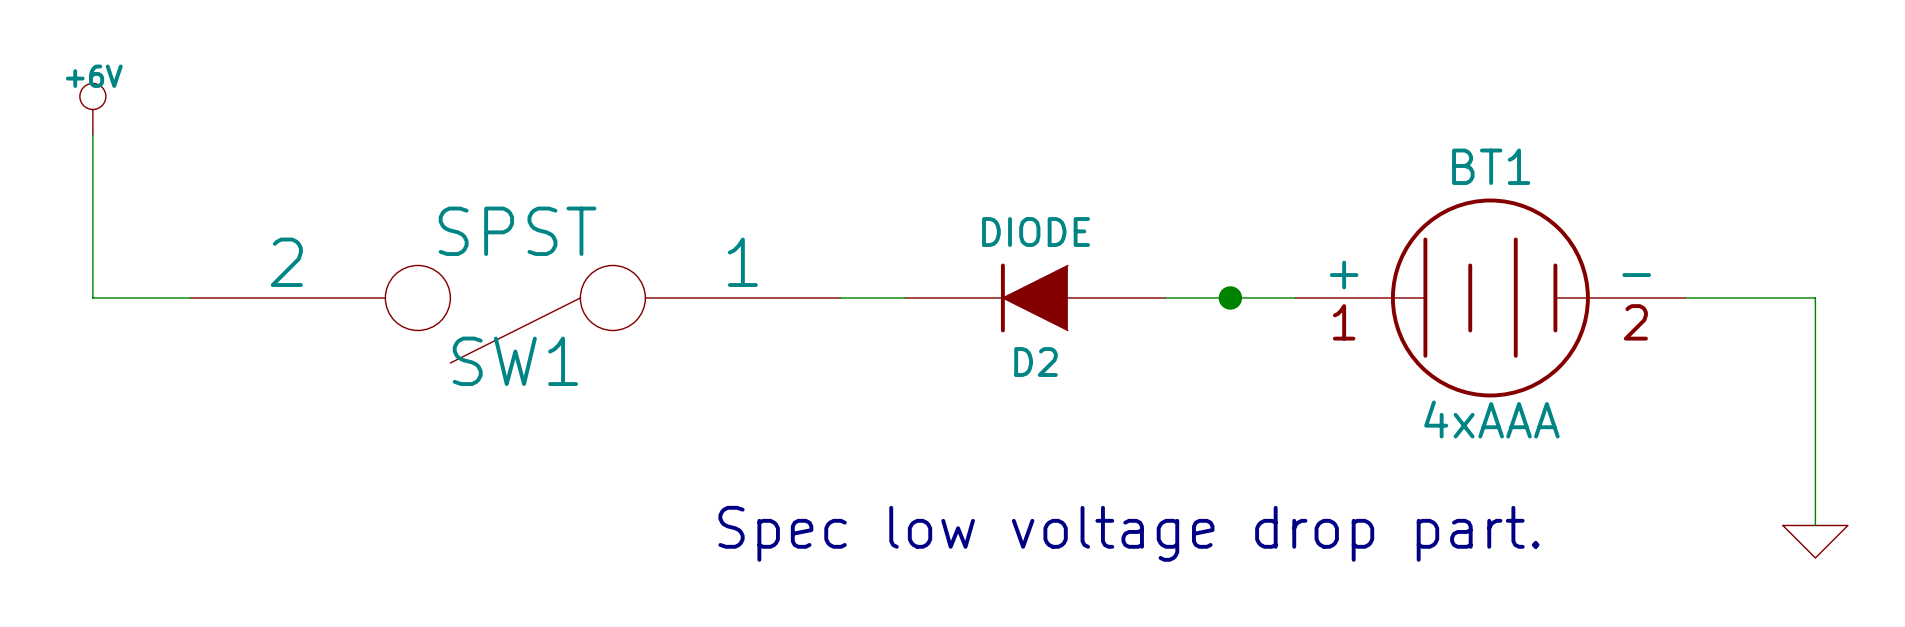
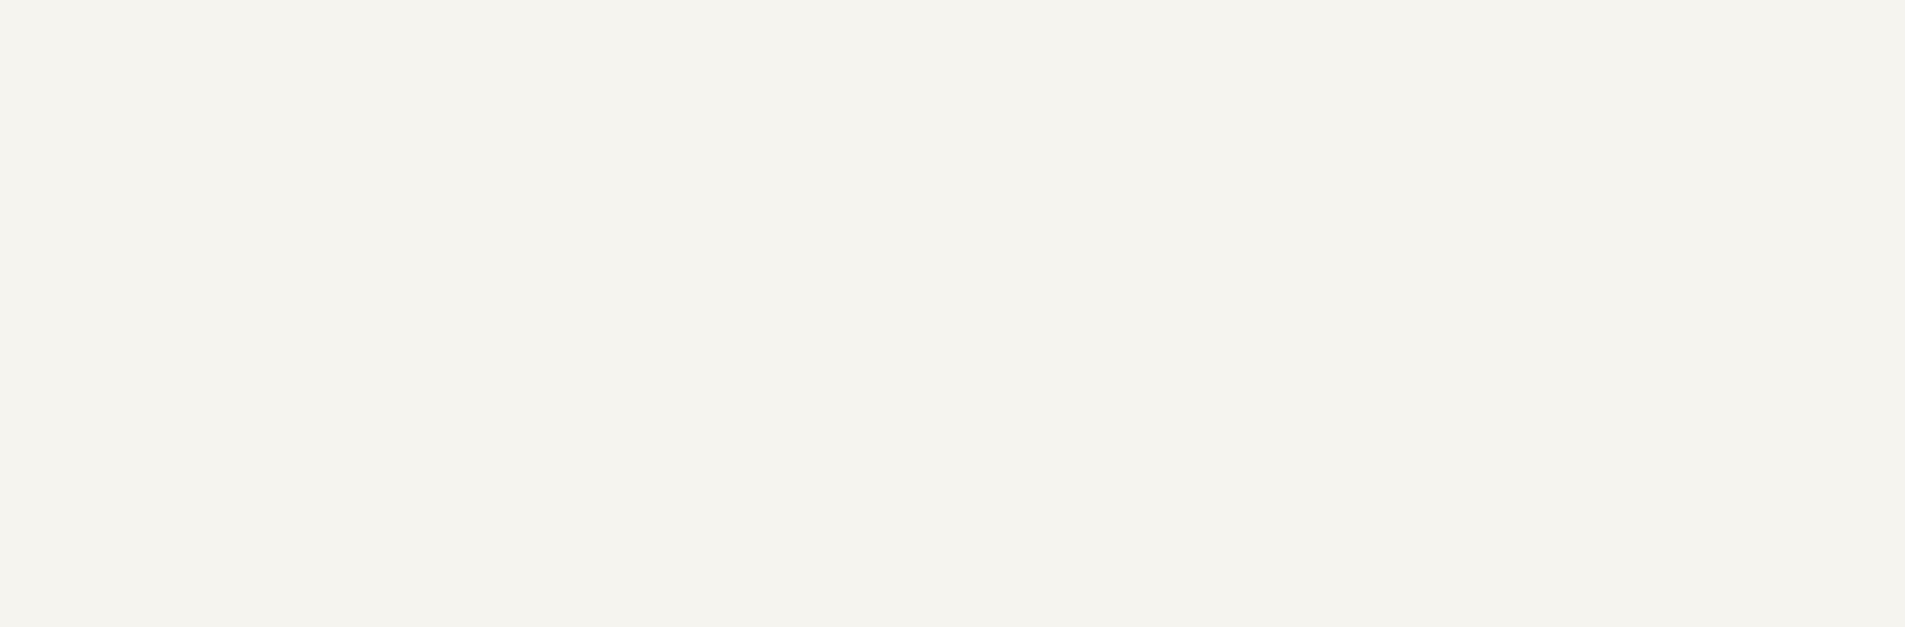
power symbol: +6V (92, 109) -> none
wire: (92, 135) (92, 297) (190, 297) -> none
wire: (840, 297) (905, 297) -> none
D2: DIODE (1035, 297) -> none
wire: (1165, 297) (1295, 297) -> none
junction: (1230, 297) -> none
BT1: 4xAAA (1490, 297) -> none
wire: (1685, 297) (1815, 297) (1815, 525) -> none
SW1: SPST (515, 314) -> none
text: Spec low voltage drop part. (1128, 533) -> none
power symbol: (1815, 541) -> none

